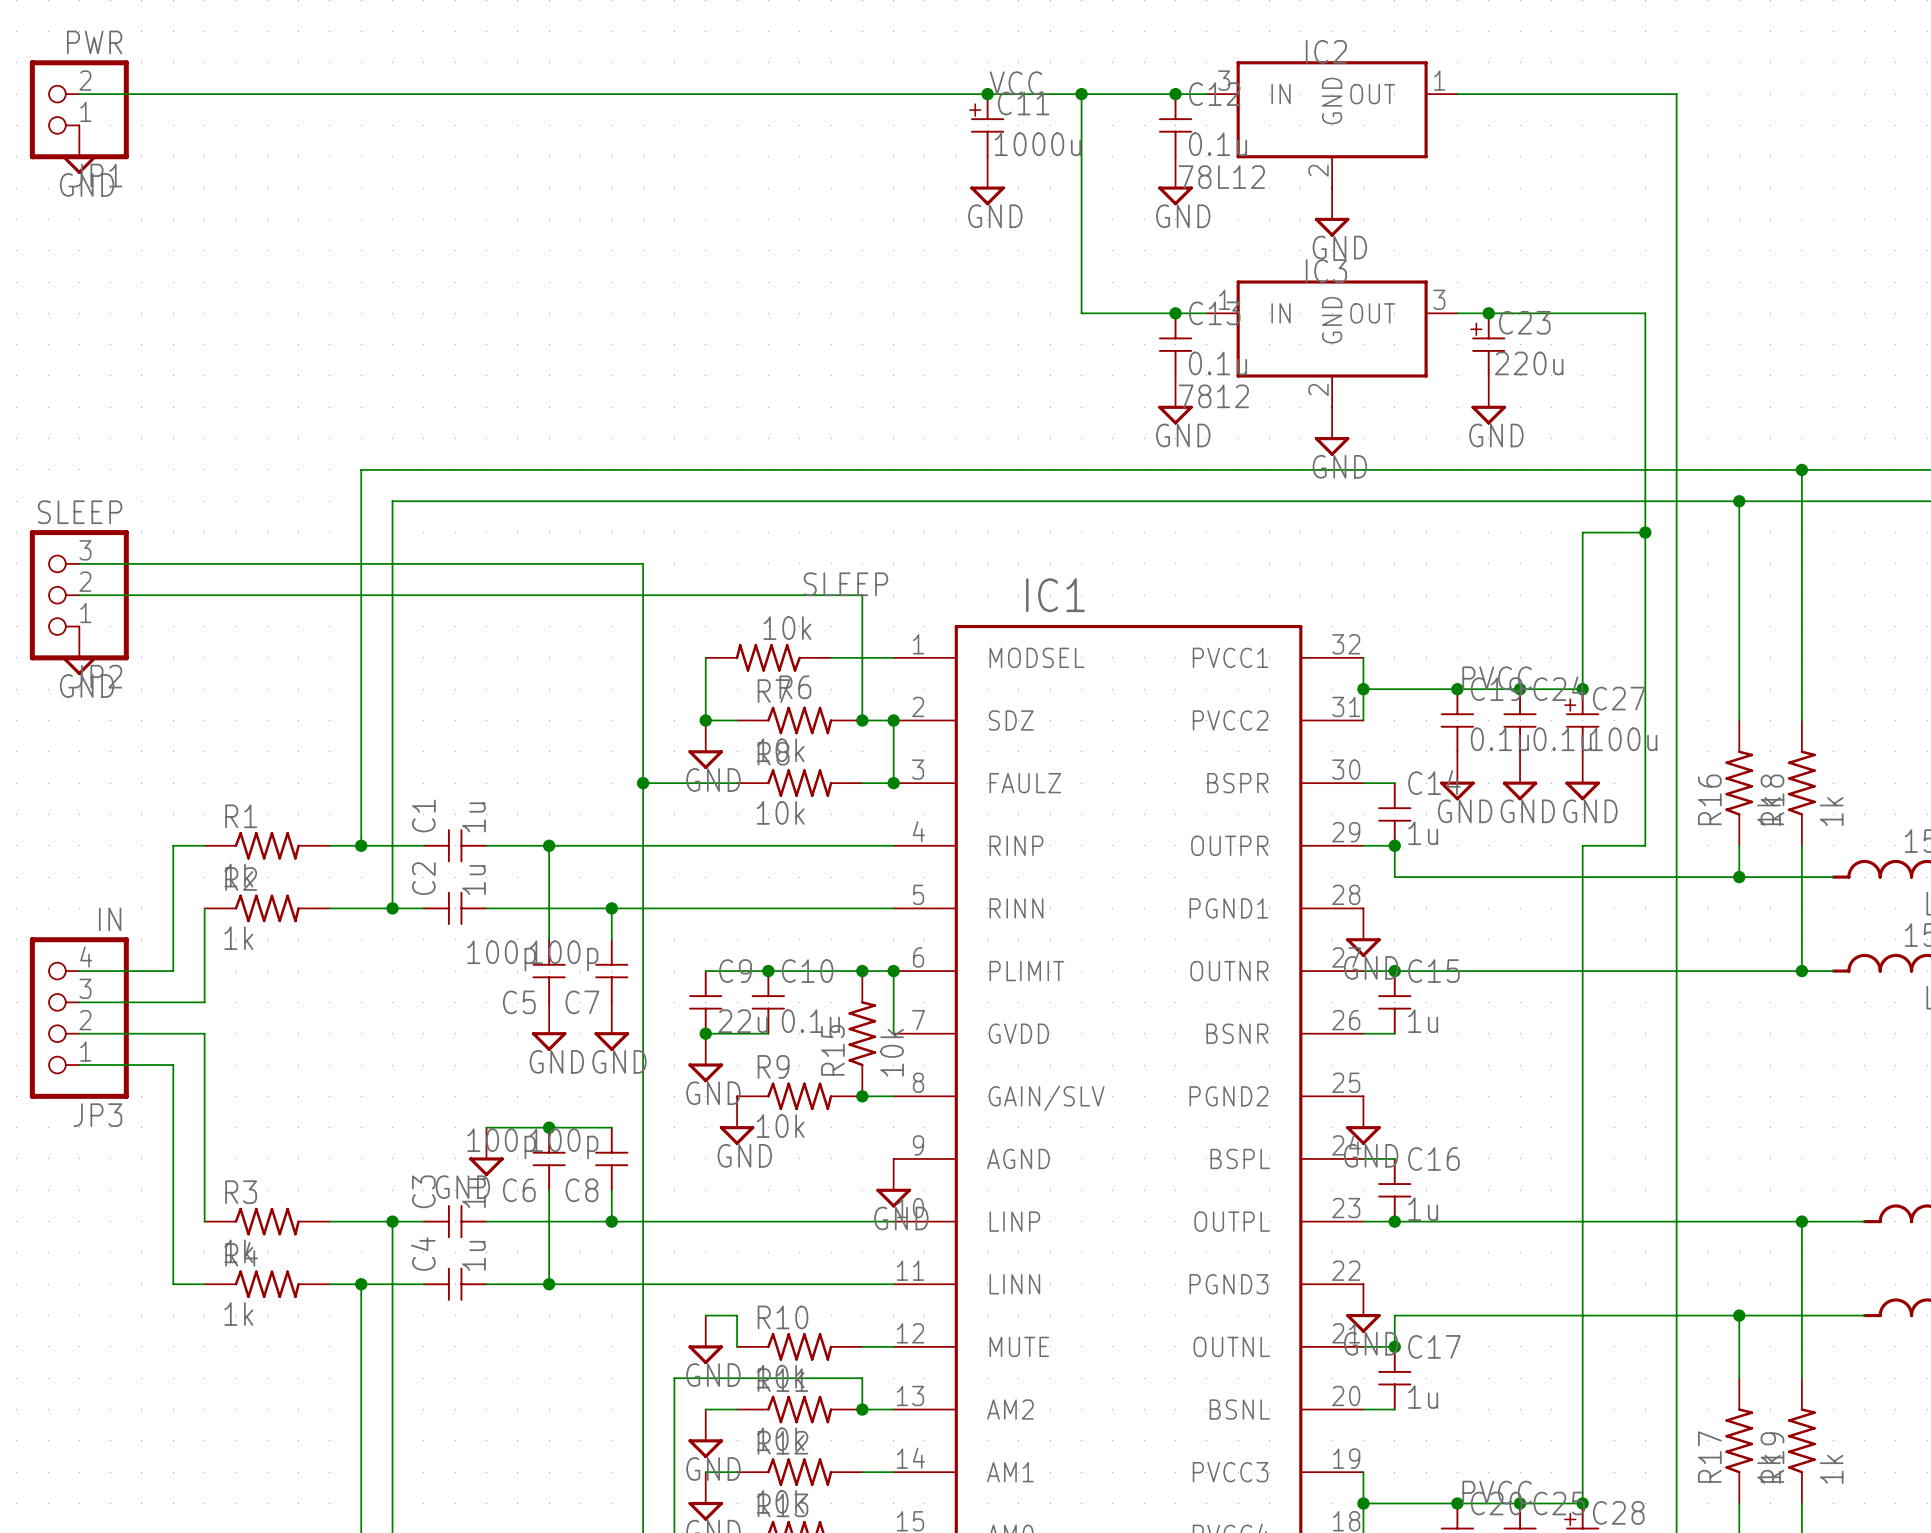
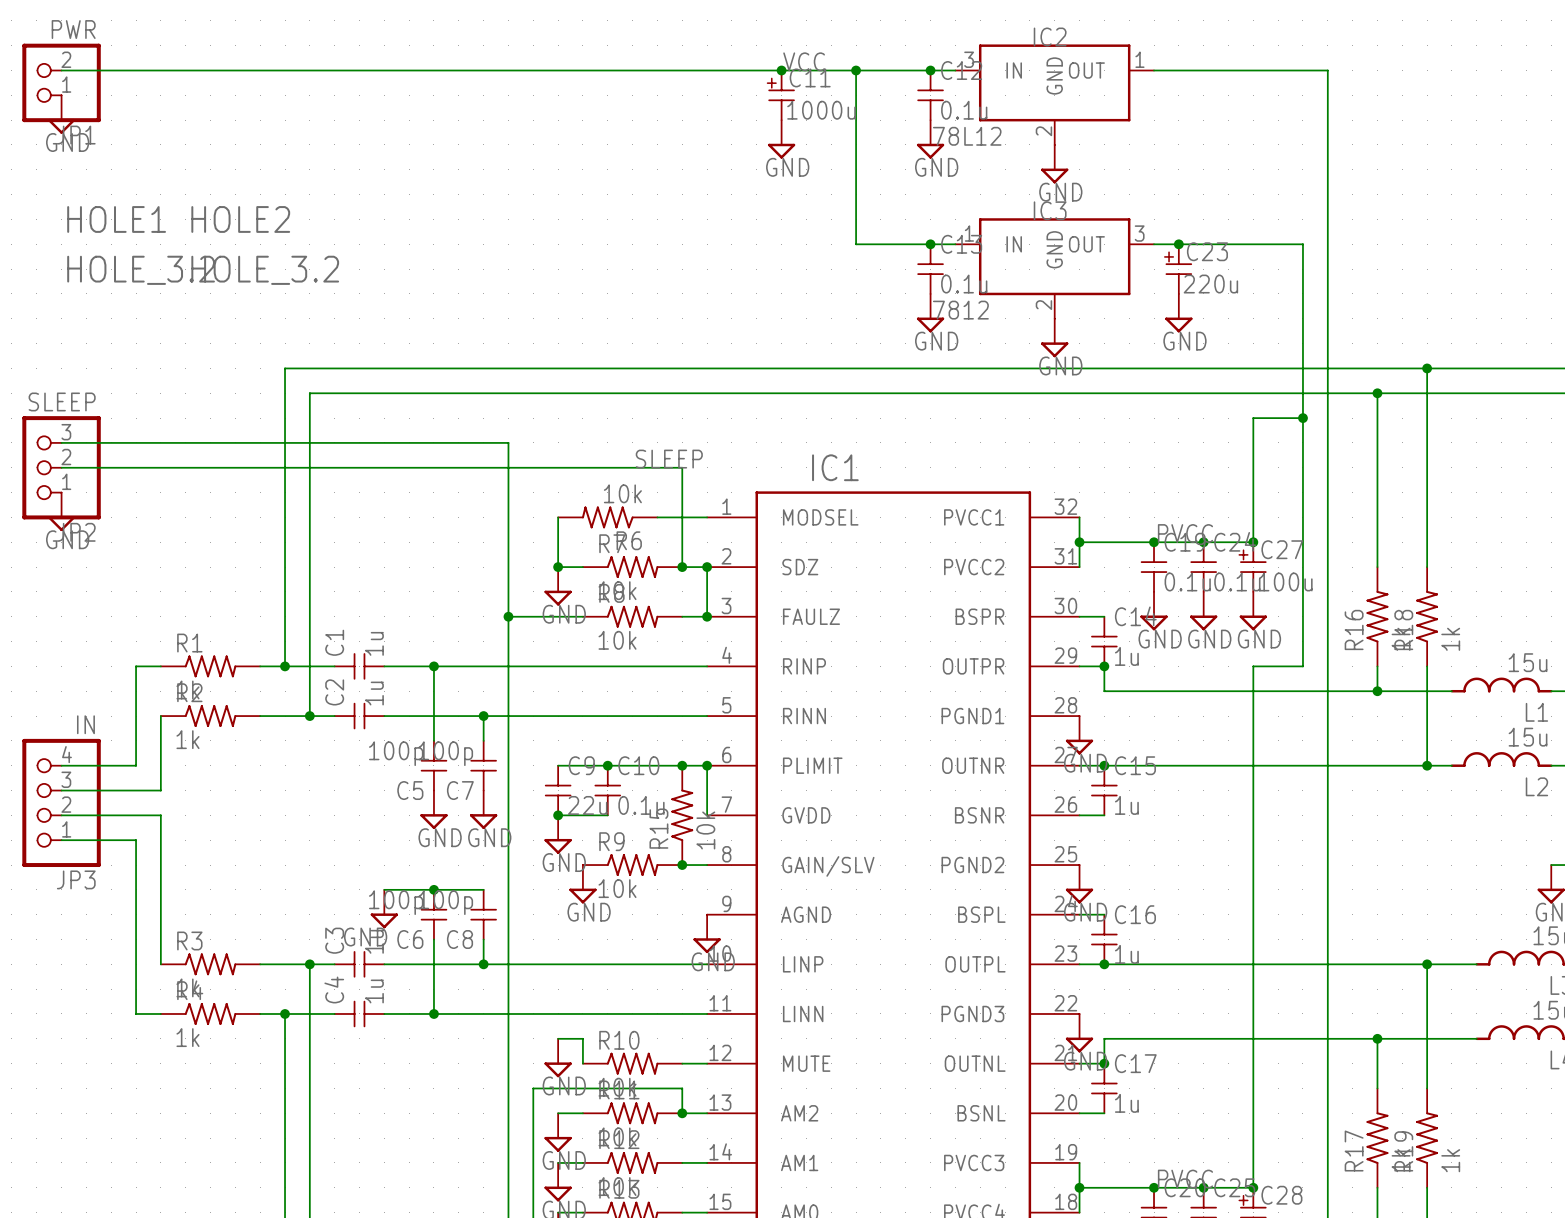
HOLE1: none -> HOLE_3.2 (141, 245)
HOLE2: none -> HOLE_3.2 (265, 245)

